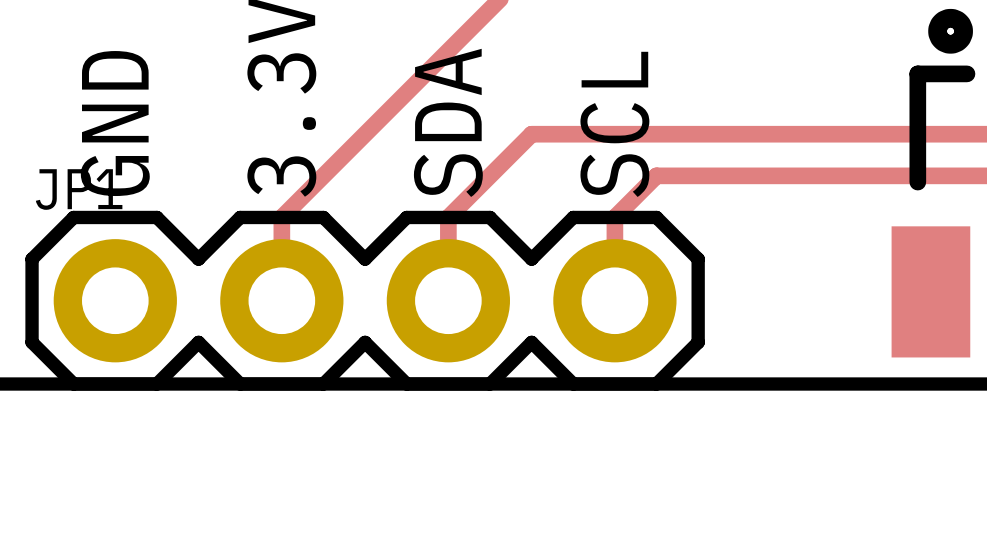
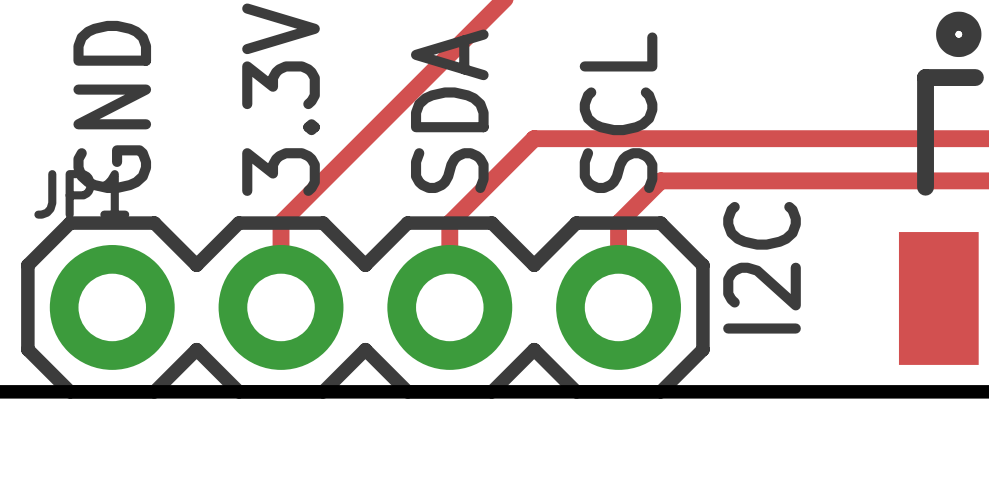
text: none -> I2C (762, 267)

